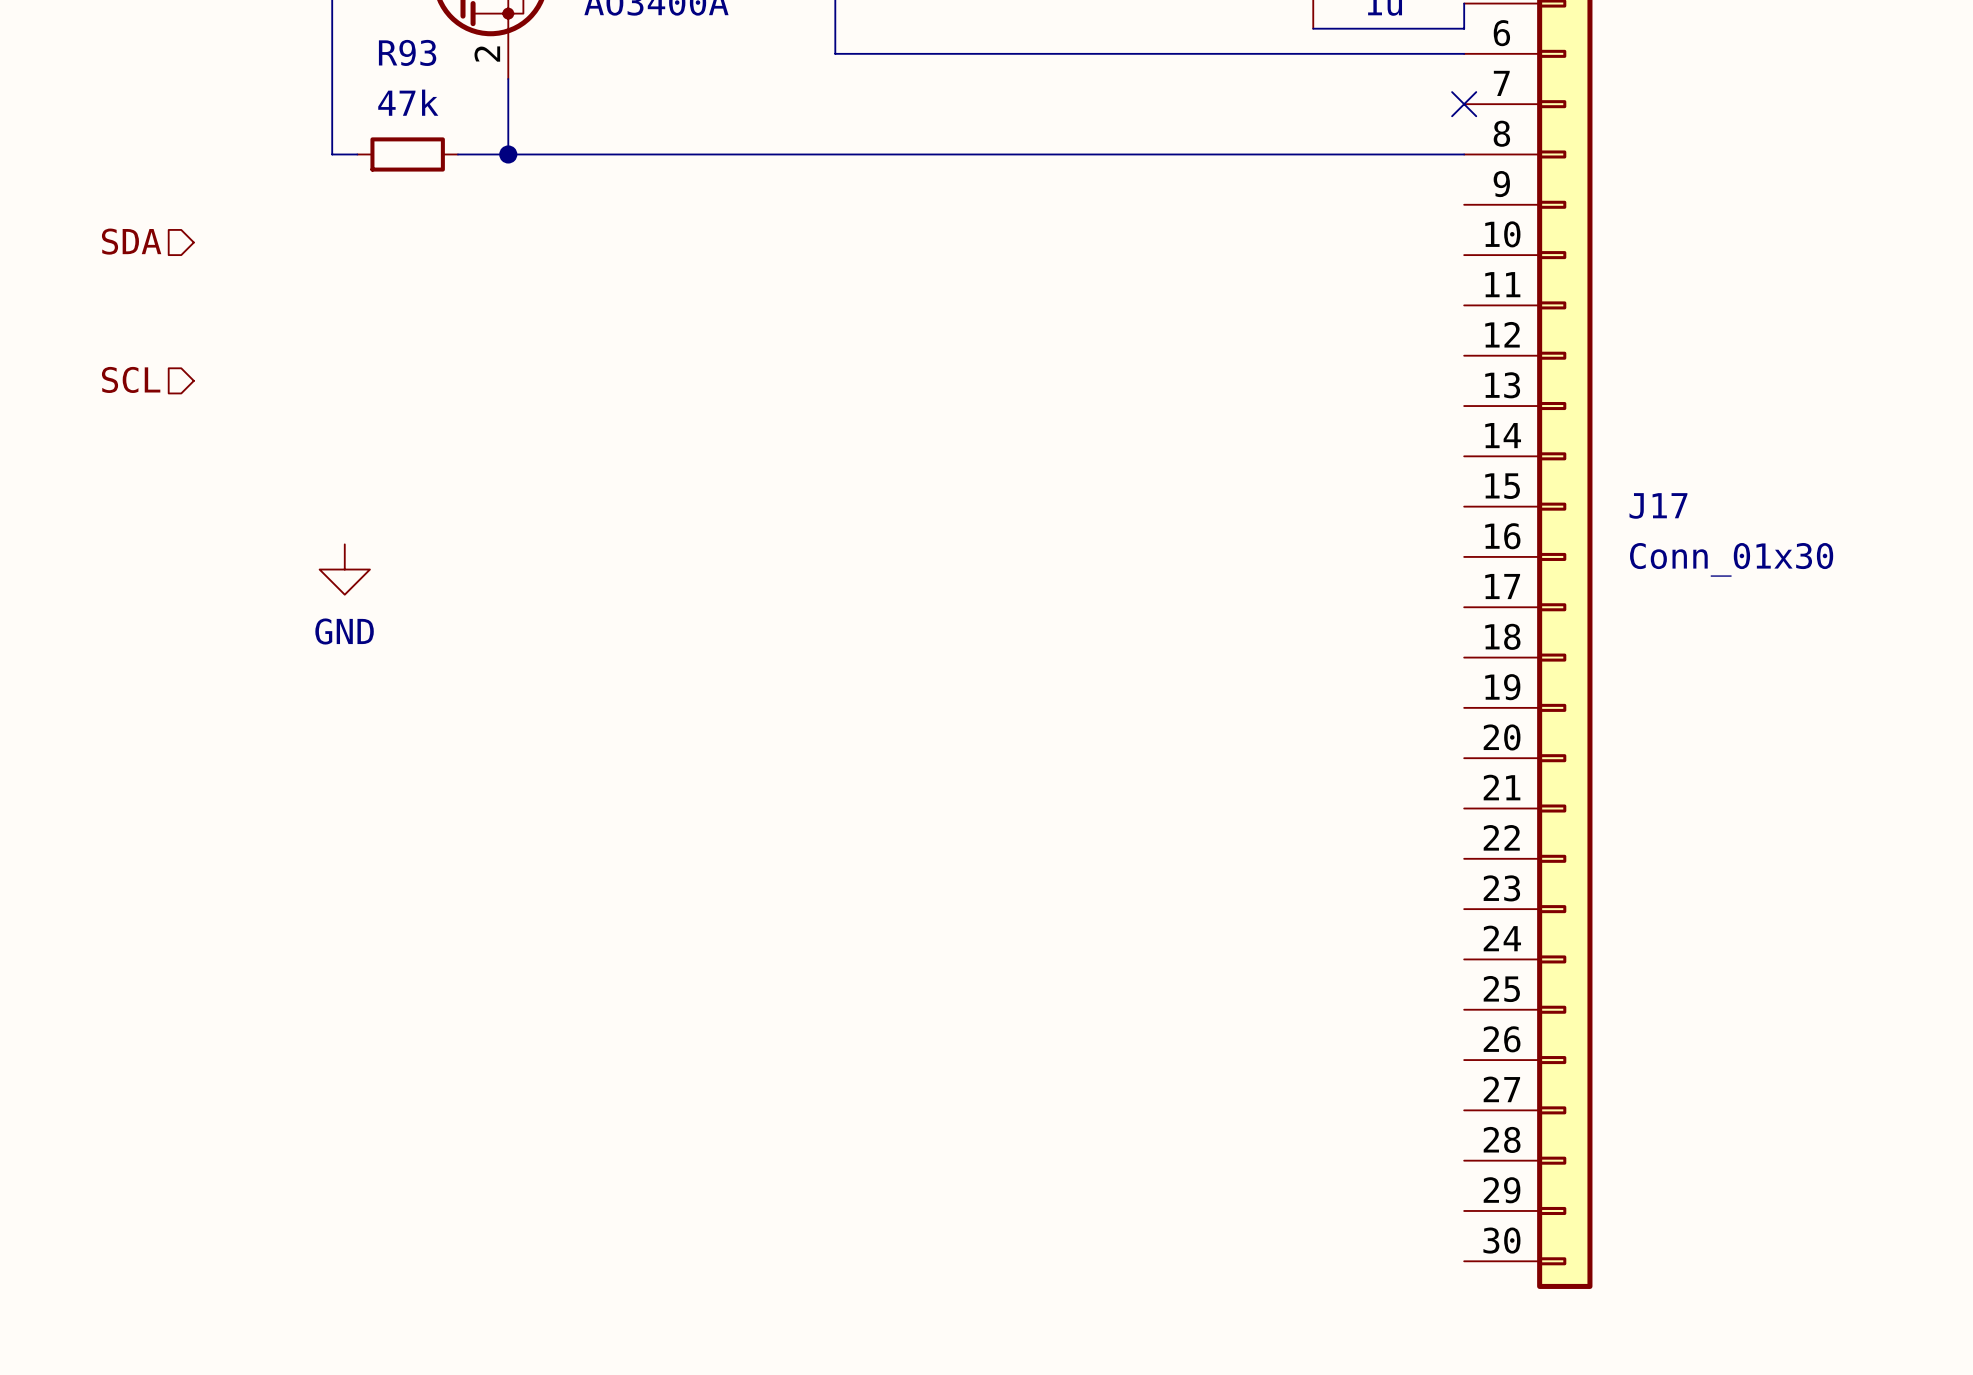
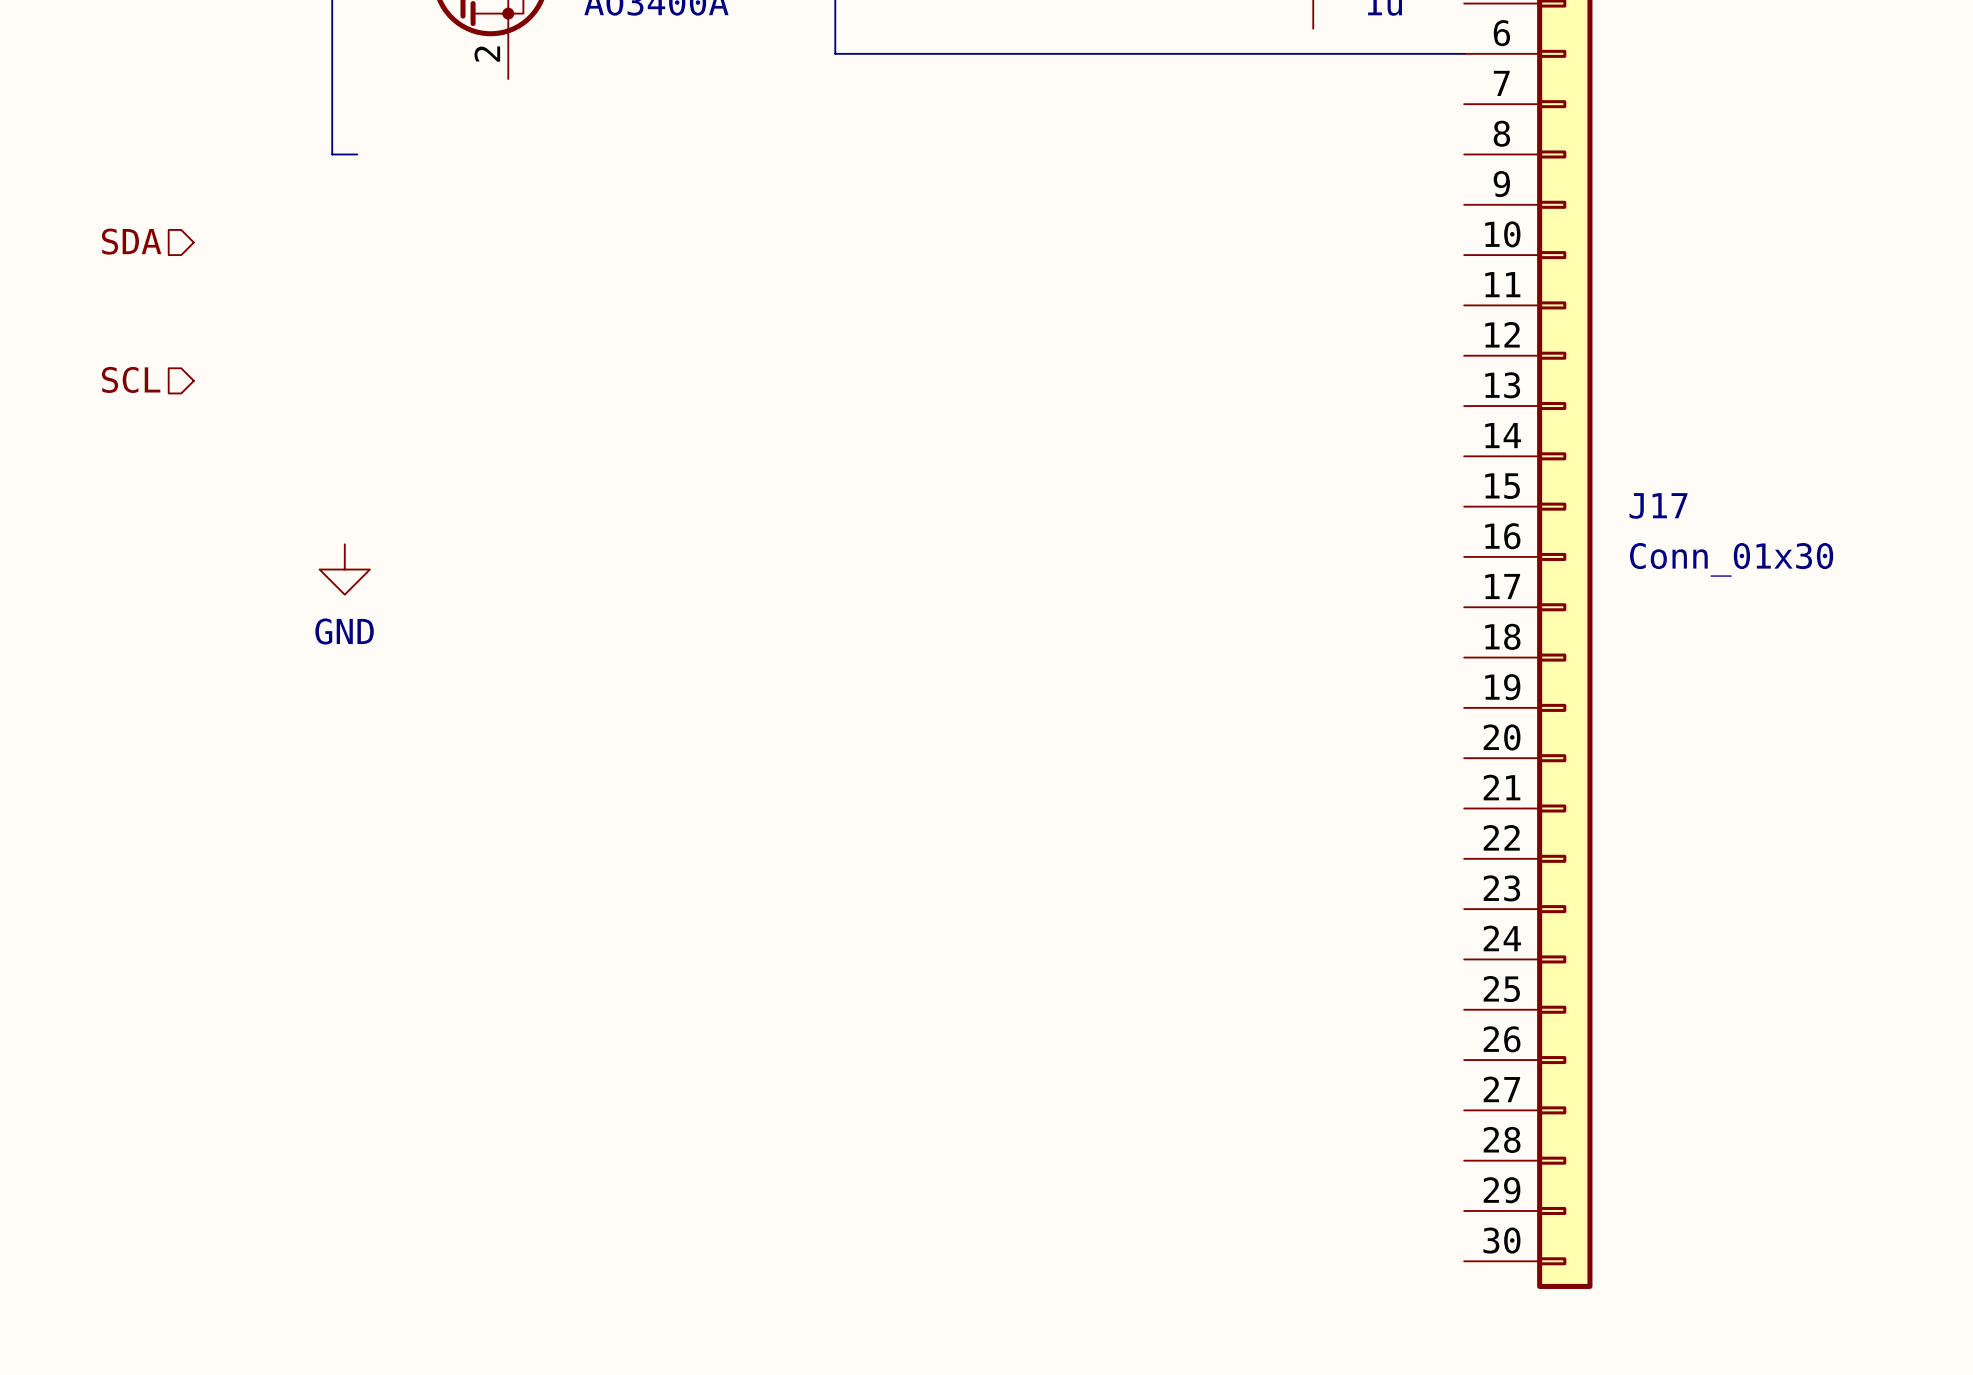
wire: (1464, 3) (1464, 28) (1313, 28) -> none
wire: (508, 79) (508, 154) -> none
no-connect mark: (1464, 104) -> none
R93: 47k (407, 154) -> none
wire: (457, 154) (1464, 154) -> none
junction: (508, 154) -> none

